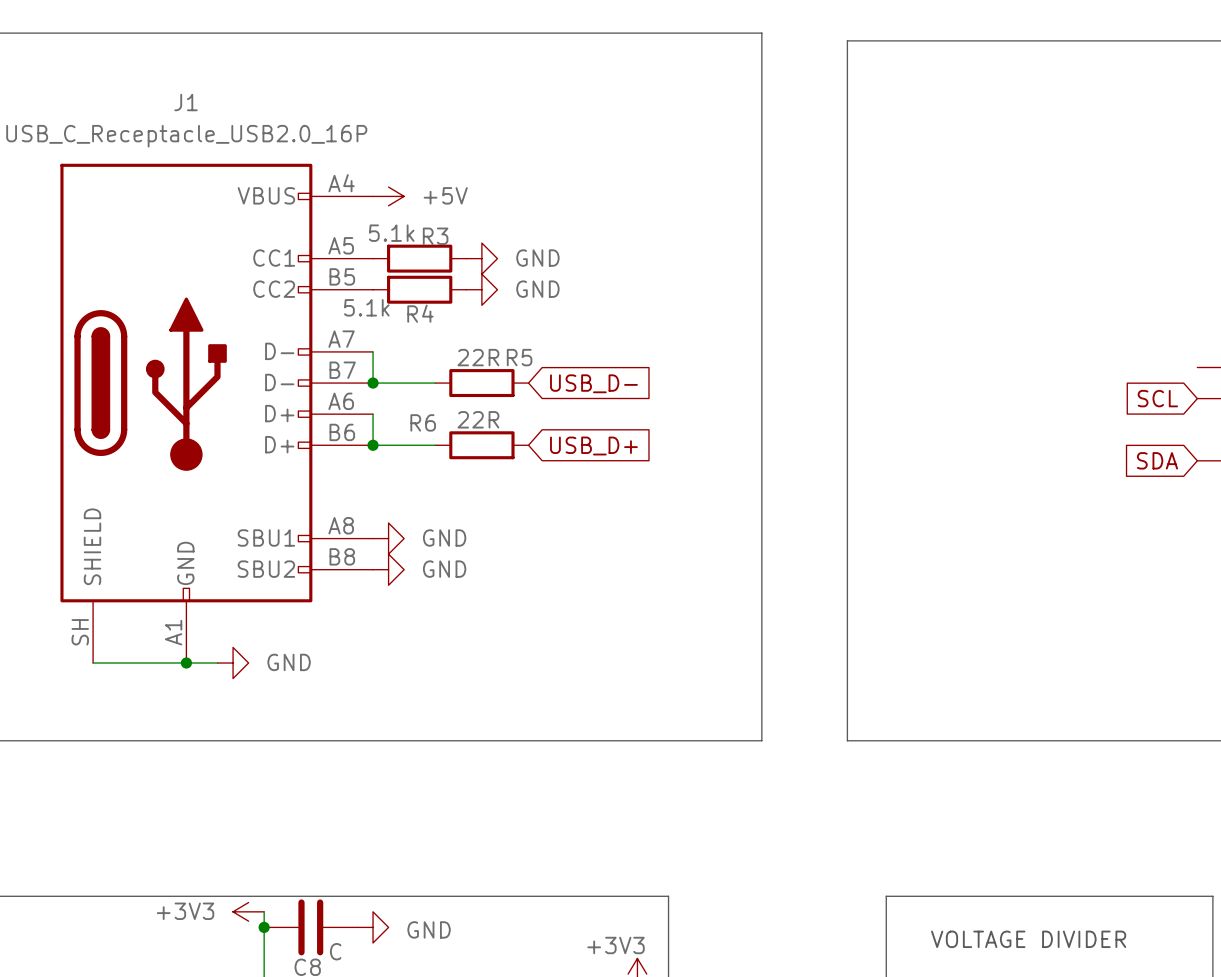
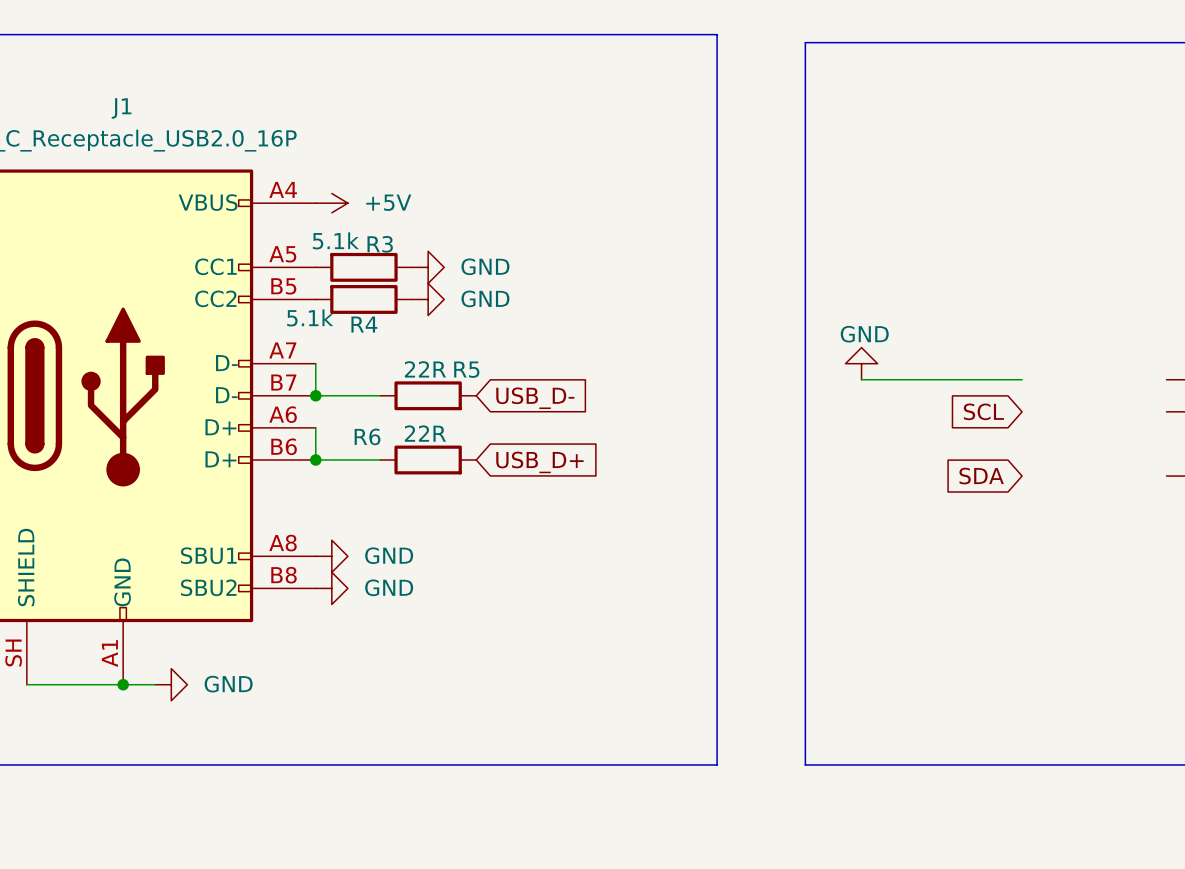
power symbol: none -> GND (861, 363)
wire: none -> (861, 379) (1022, 379)
global label position: SCL (1157, 398) -> SCL (983, 411)
global label position: SDA (1157, 460) -> SDA (981, 476)

